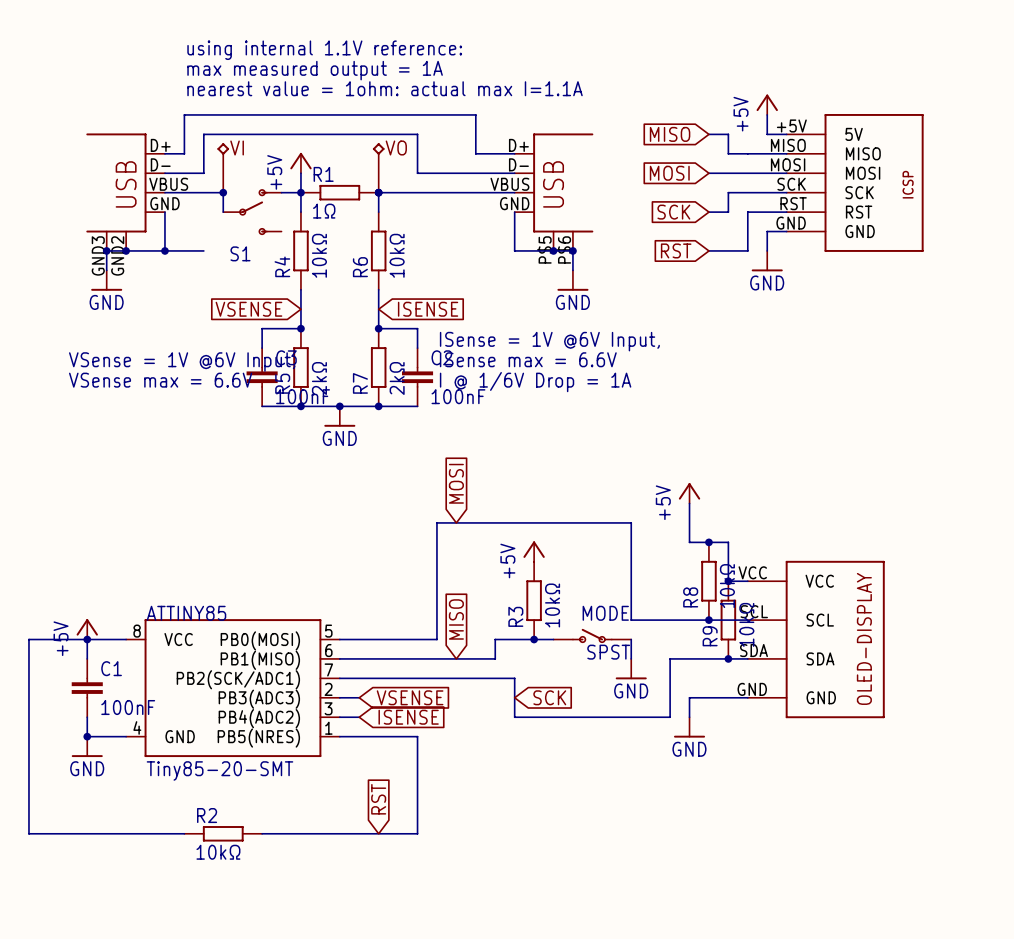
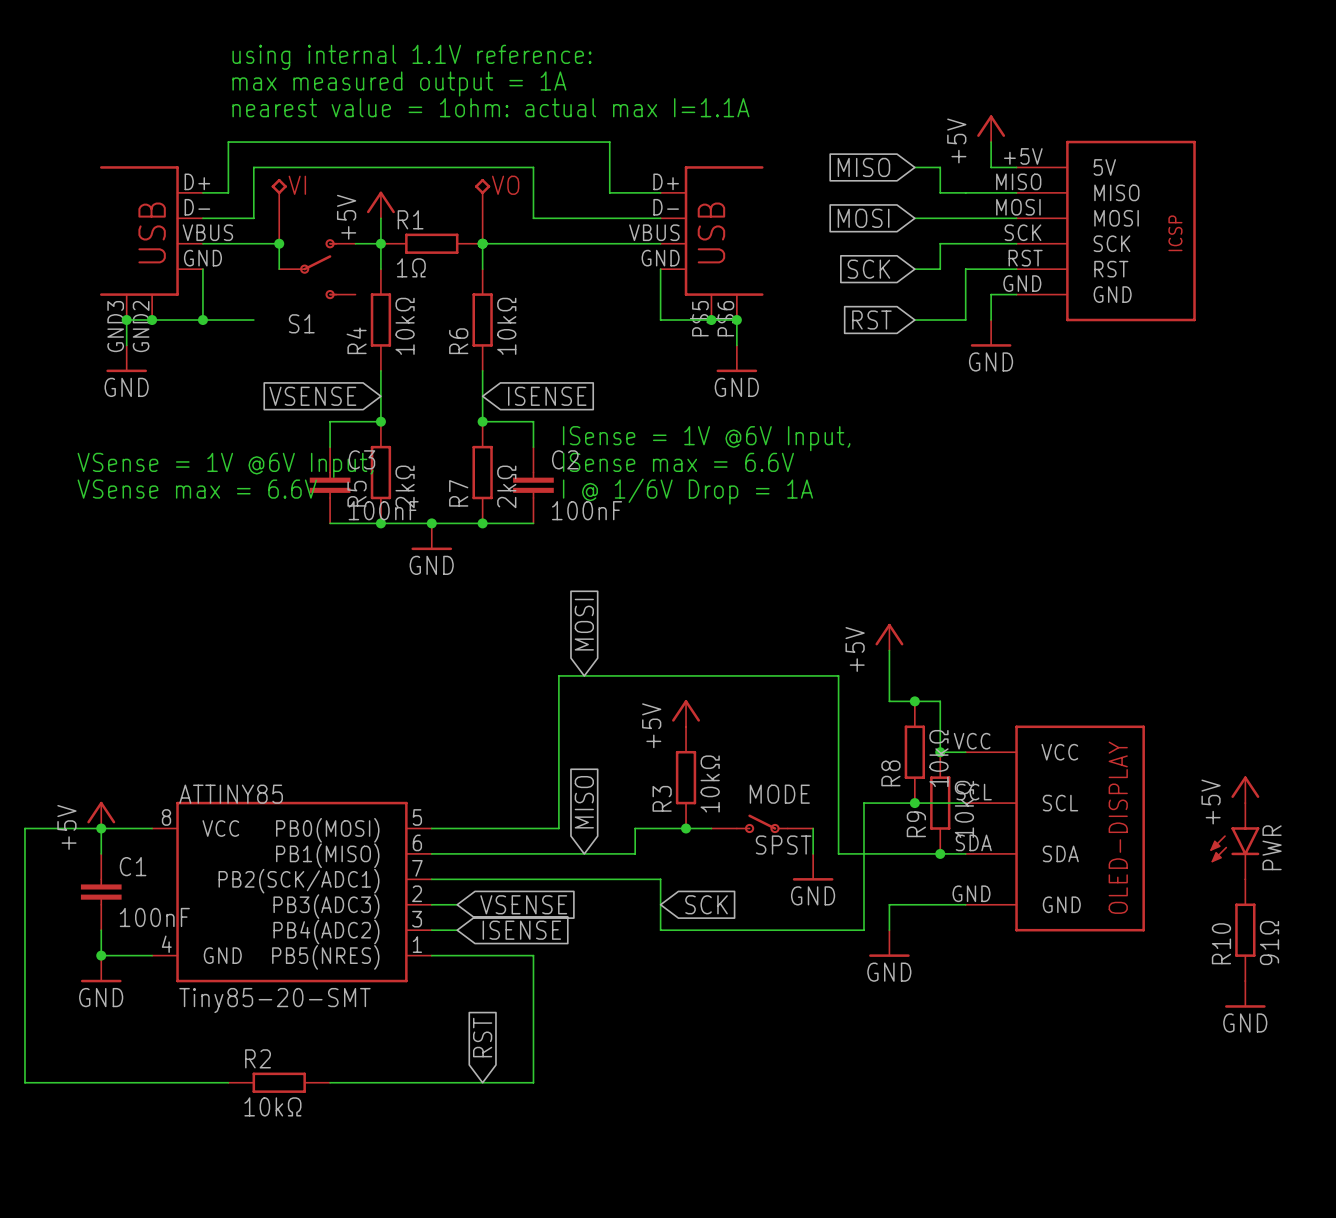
wire: (631, 522) (631, 620) (670, 620) -> (813, 675) (838, 675) (838, 853) (863, 853) (863, 803)
power symbol: none -> +5V (1245, 789)
PWR: none -> (1234, 841)
R10: none -> 91Ω (1245, 930)
power symbol: none -> GND (1245, 994)

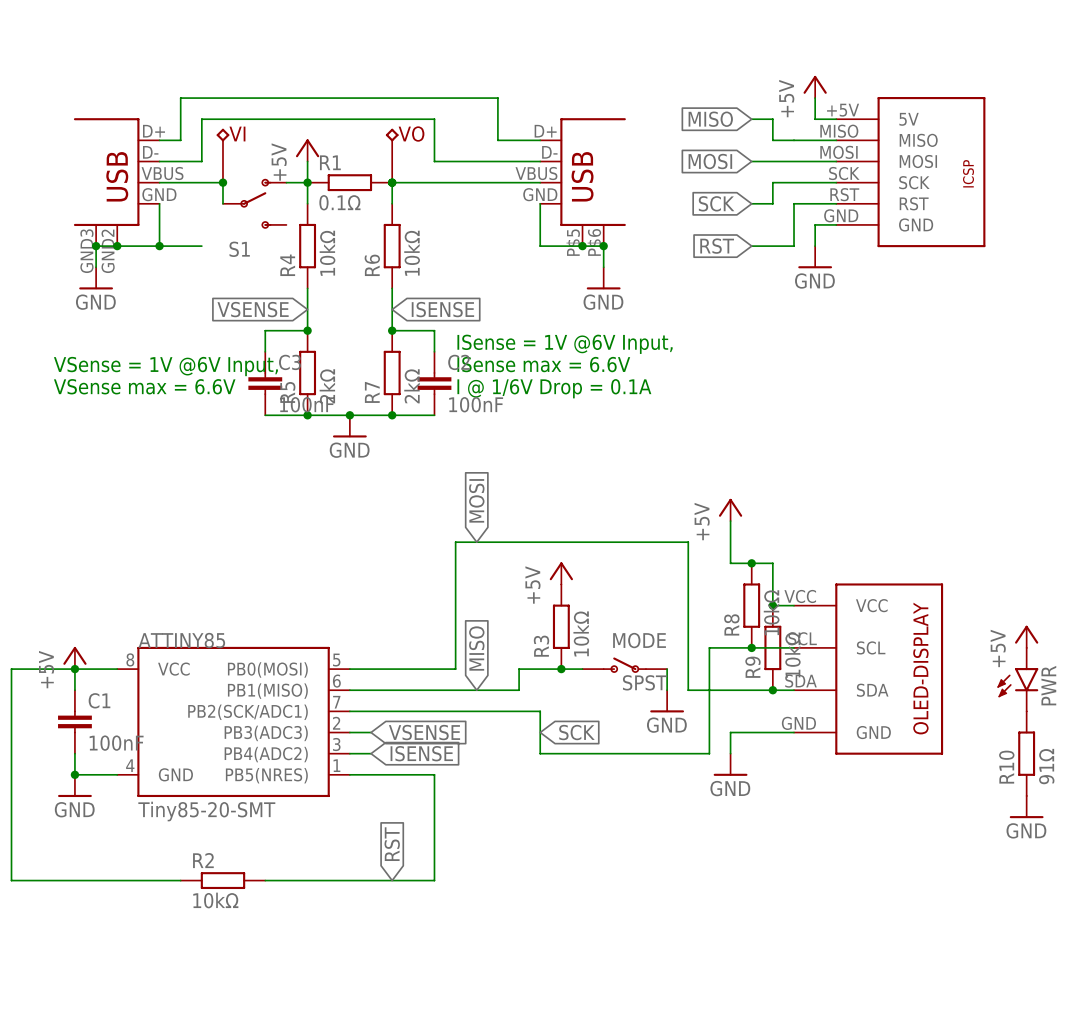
text: using internal 1.1V reference: (411, 57) -> none
text: max measured output = 1A (399, 83) -> none
text: nearest value = 1ohm: actual max I=1.1A (490, 107) -> none
R1 value: 1Ω (411, 267) -> 0.1Ω (339, 202)
text: I @ 1/6V Drop = 1A (687, 491) -> I @ 1/6V Drop = 0.1A (554, 388)

